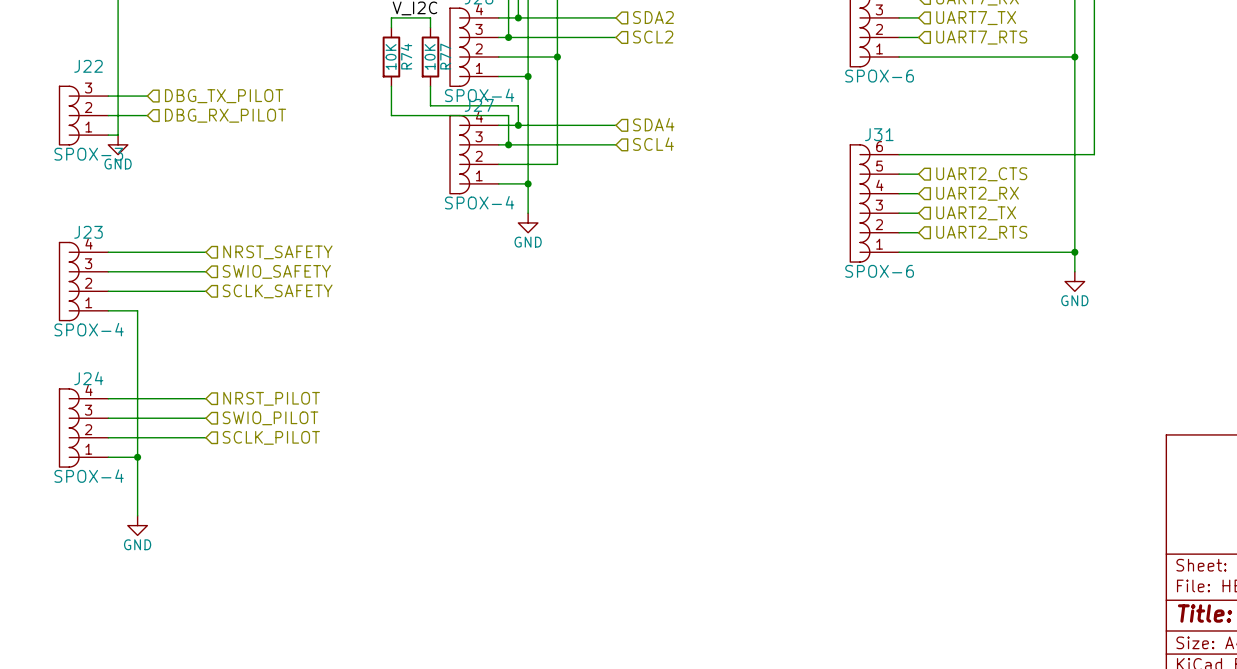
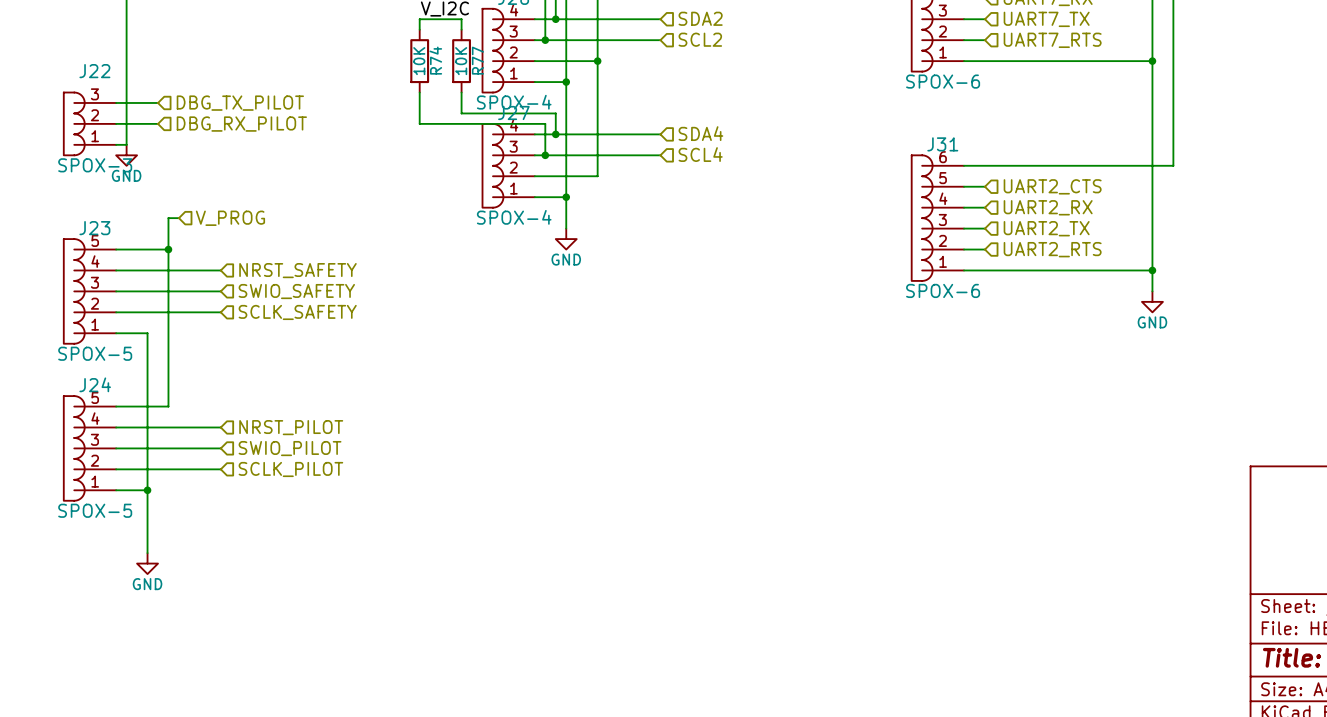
wire: none -> (178, 218) (168, 218) (168, 406) (116, 406)
hierarchical label: none -> V_PROG (230, 218)
wire: none -> (116, 249) (168, 249)
junction: none -> (168, 249)
J23 symbol: [59, 242, 109, 321] -> [63, 239, 117, 344]
J23 value: SPOX-4 (89, 329) -> SPOX-5 (95, 353)
J24 symbol: [59, 388, 109, 468] -> [63, 396, 117, 501]
J24 value: SPOX-4 (89, 476) -> SPOX-5 (95, 510)

